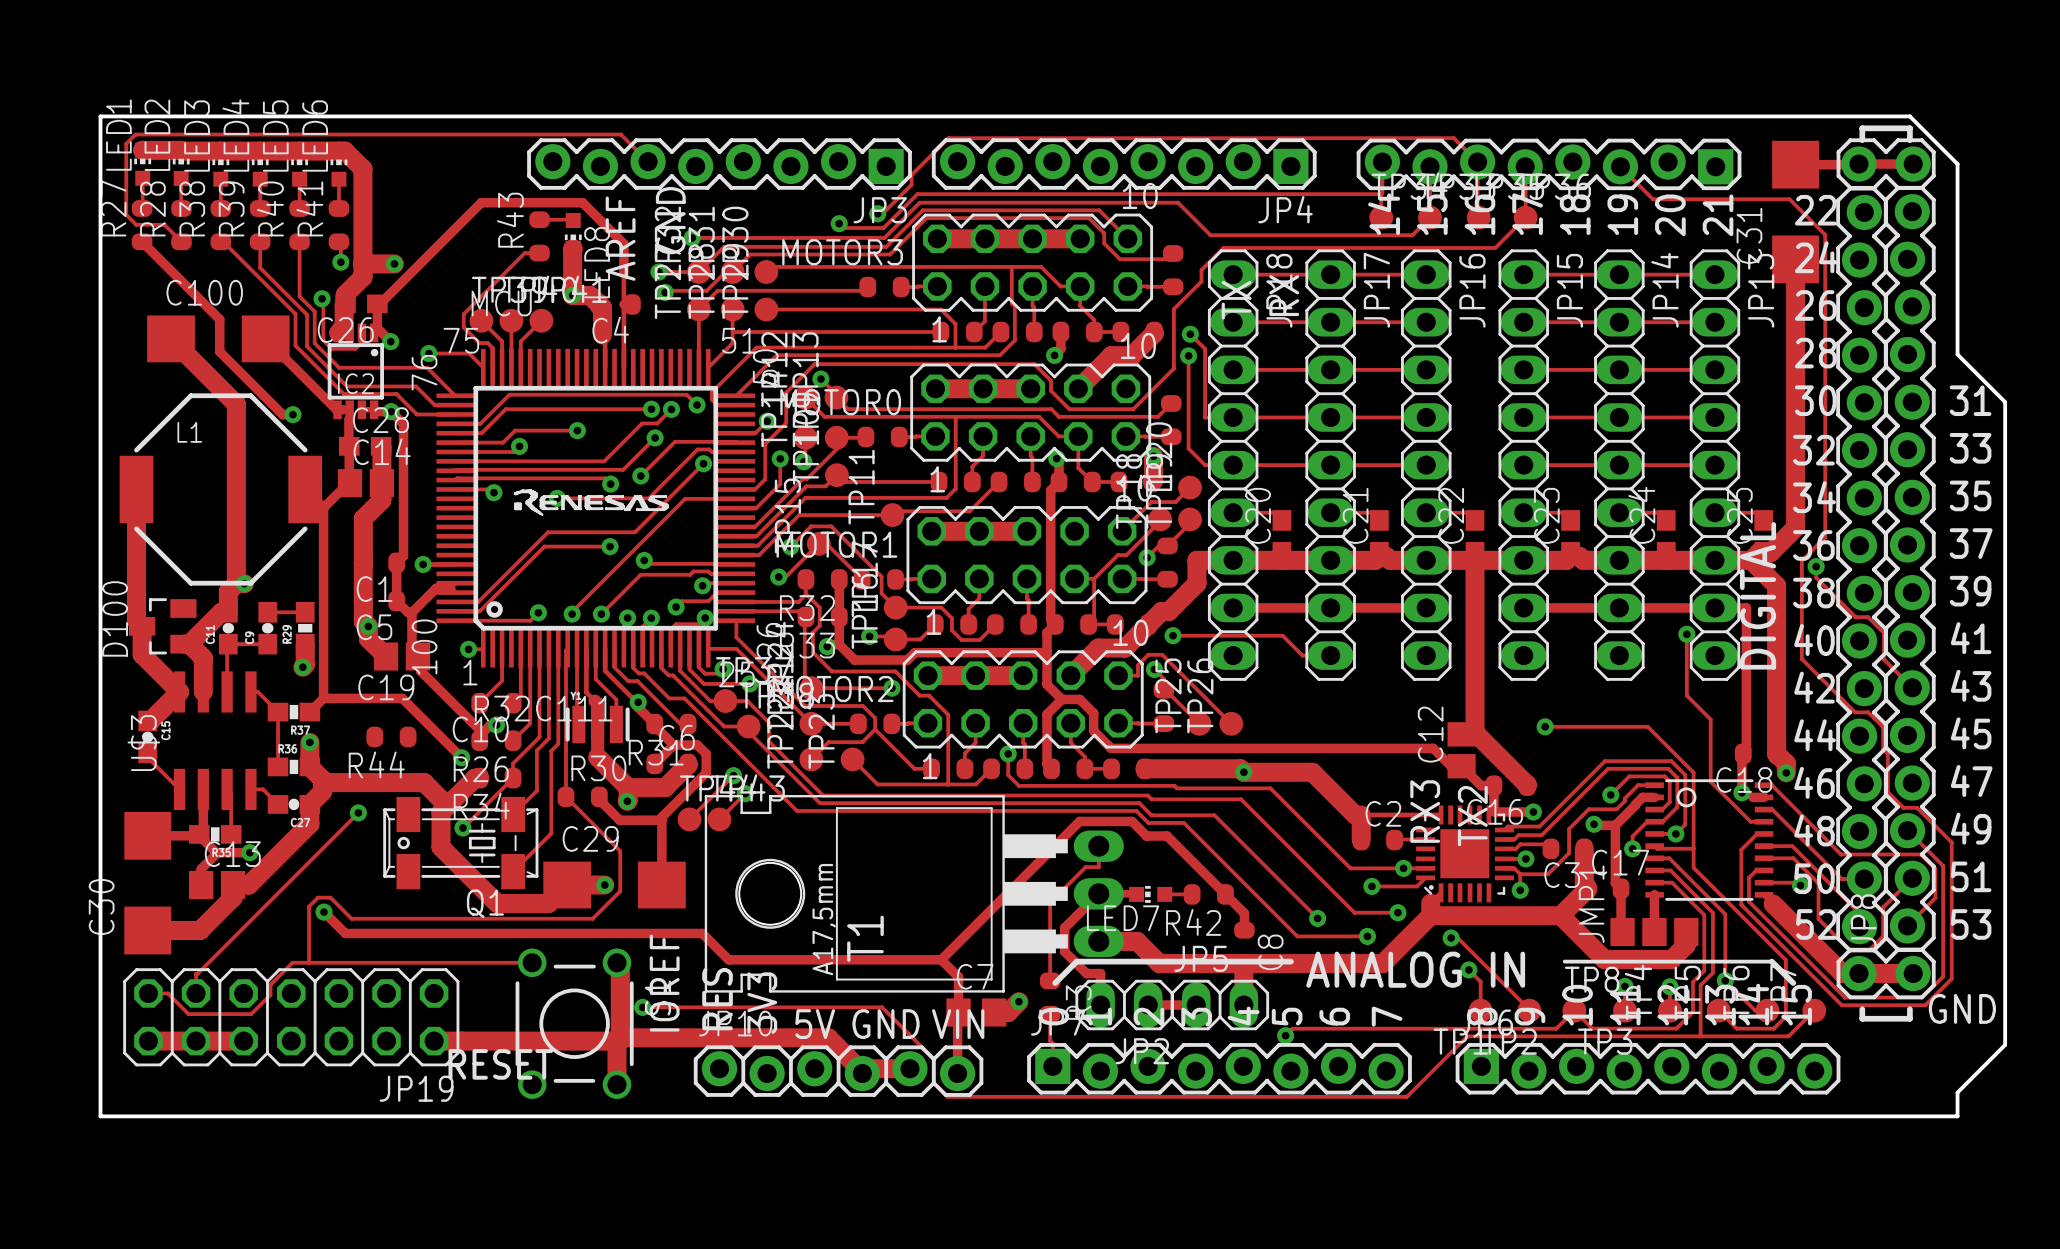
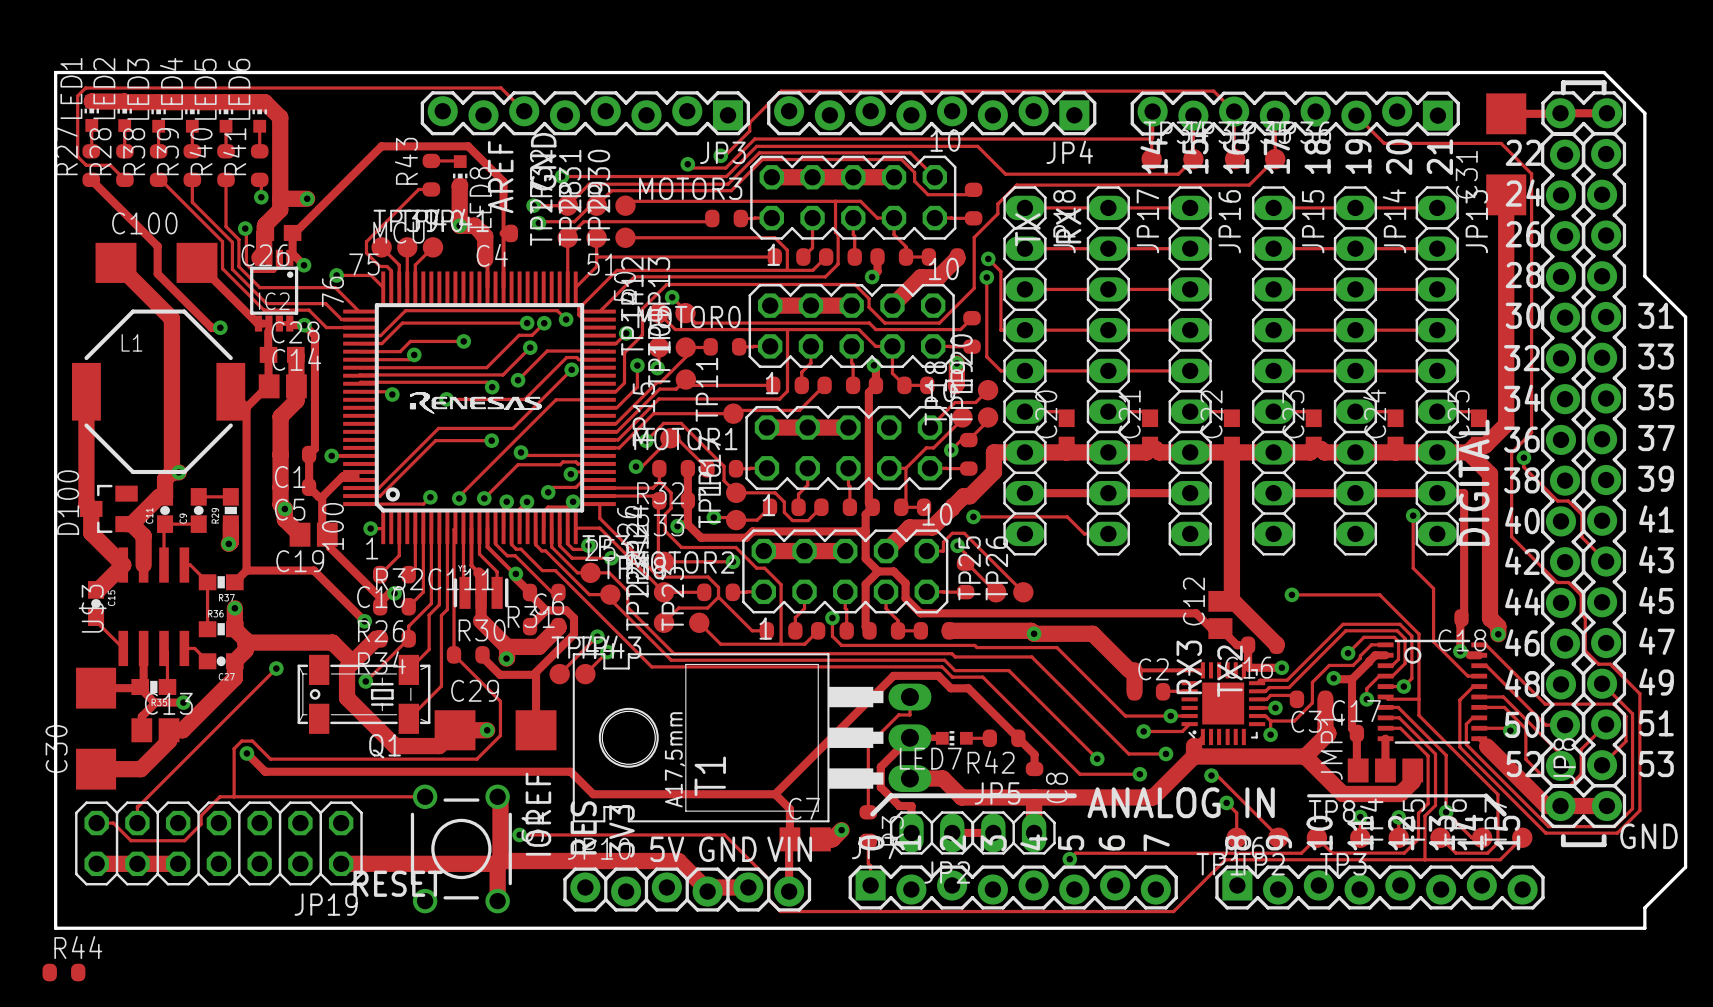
R44 position: (391, 736) -> (63, 972)
R44 name position: R44 (376, 764) -> R44 (78, 947)

